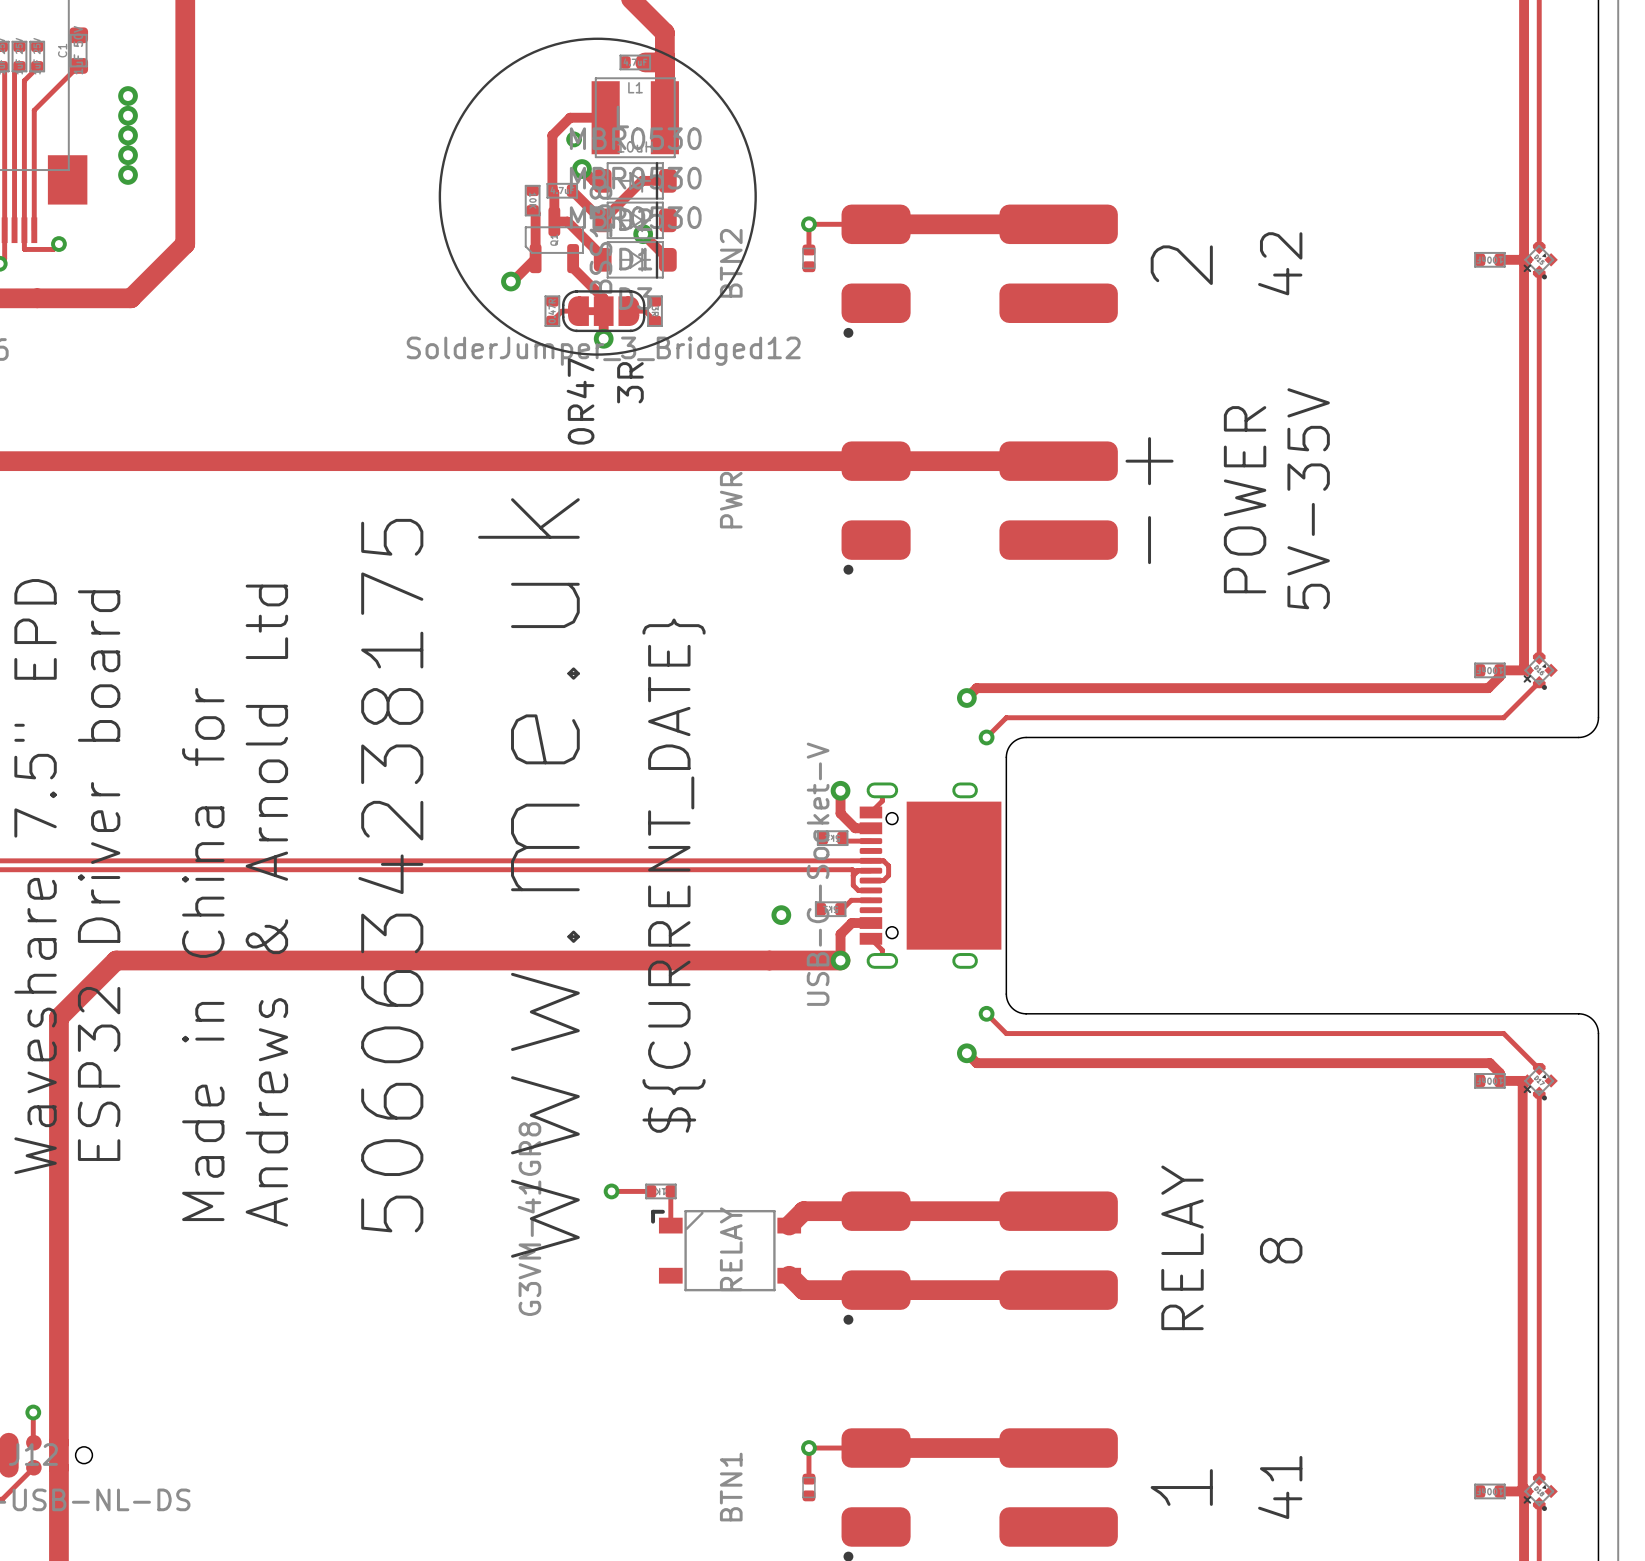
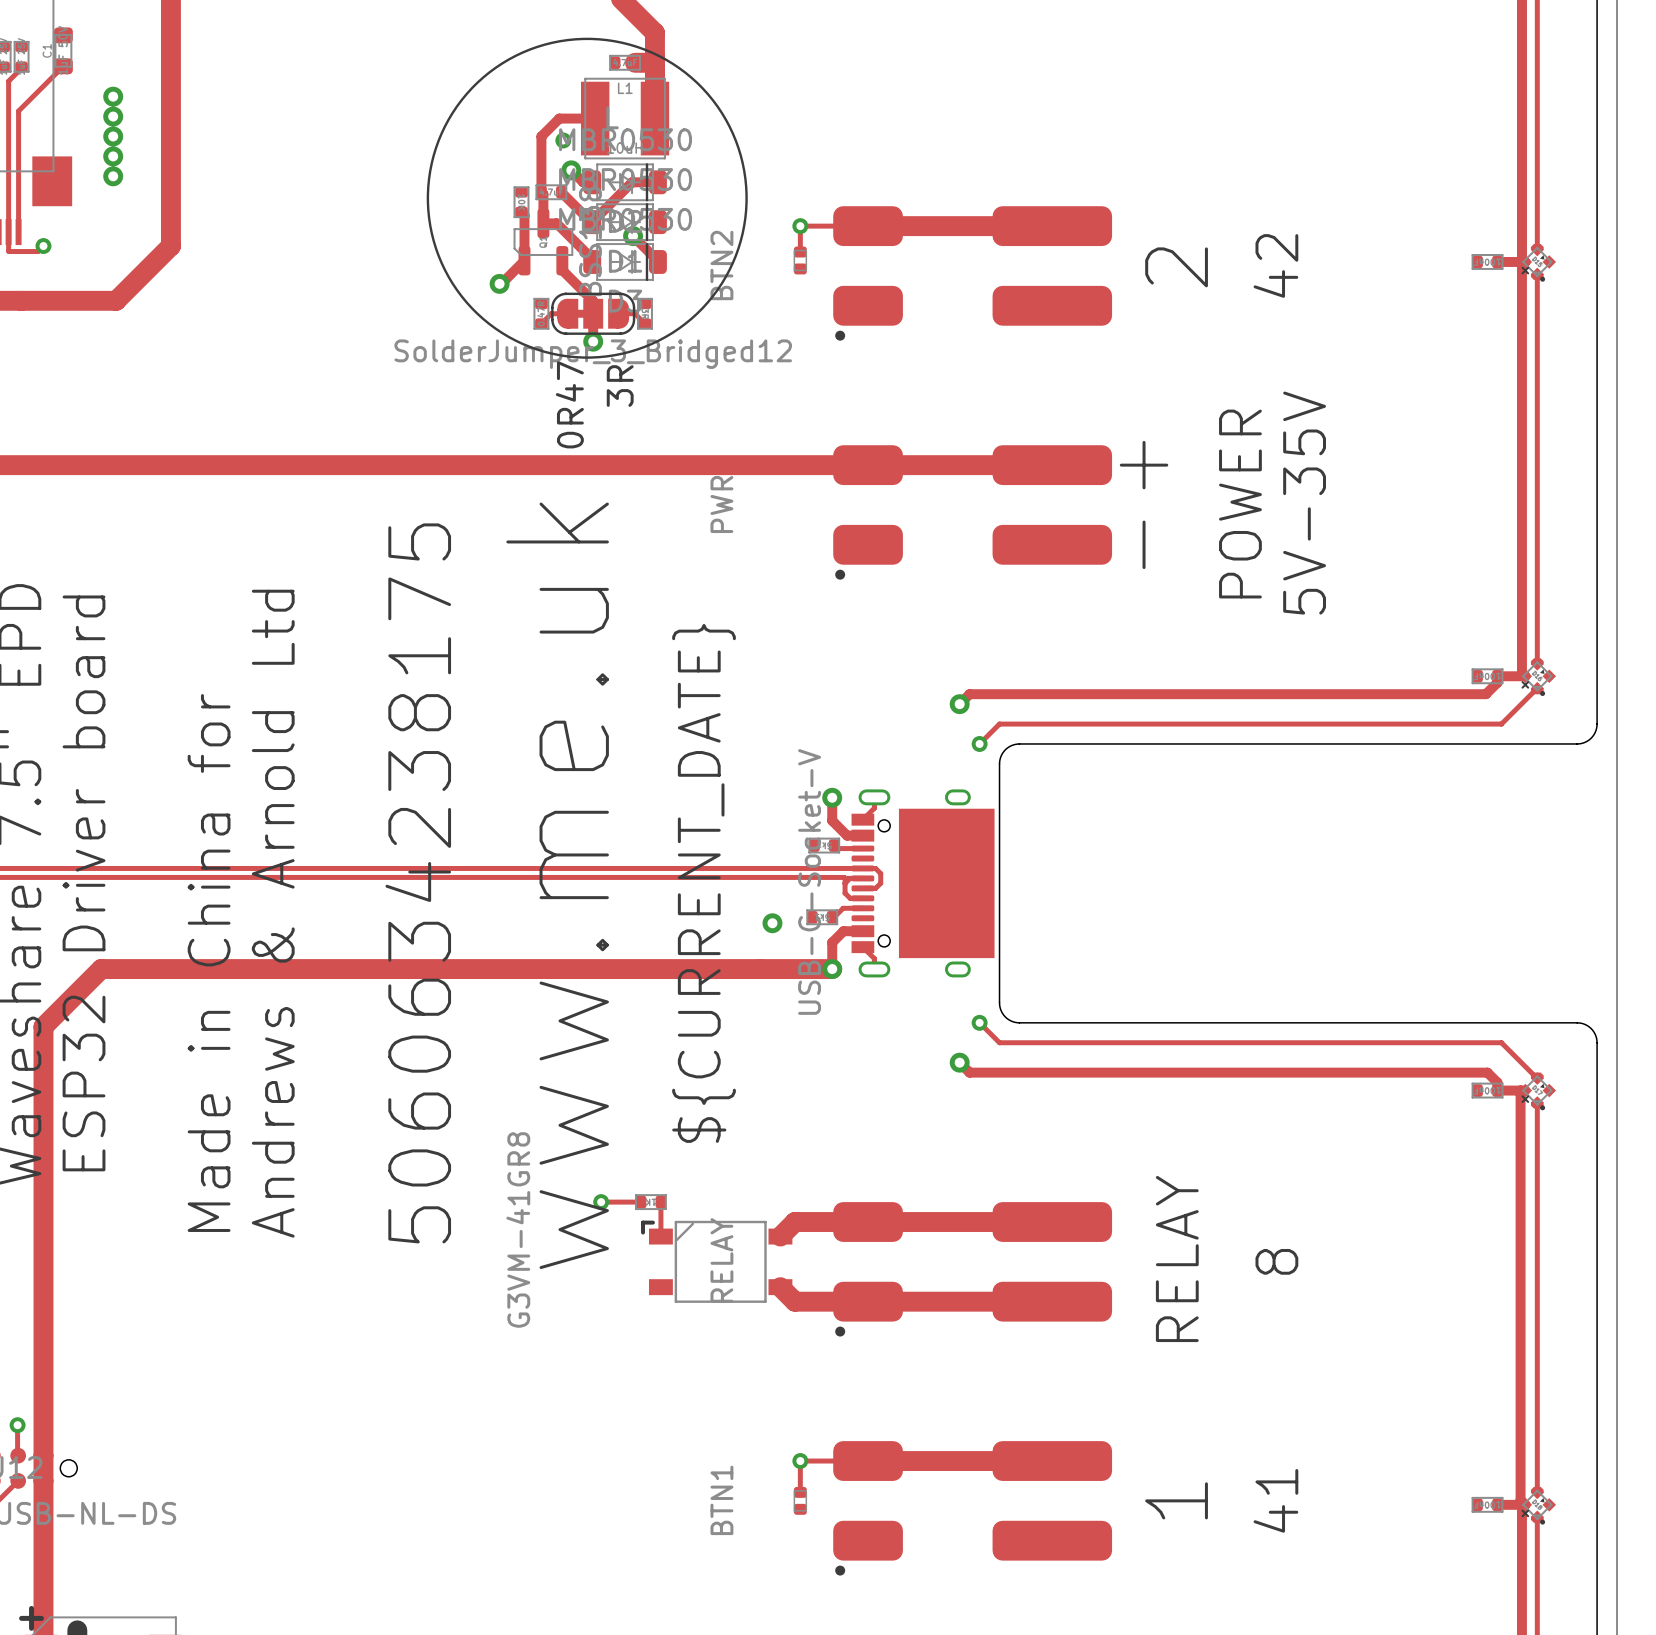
text position: 5060634238175 (390, 875) -> 5060634238175 (418, 883)
text position: ${CURRENT_DATE} (674, 875) -> ${CURRENT_DATE} (704, 883)
text position: www.me.uk (528, 877) -> www.me.uk (557, 885)
text position: Andrews & Arnold Ltd (266, 905) -> Andrews & Arnold Ltd (273, 913)
text position: Made in China for (203, 954) -> Made in China for (209, 963)

